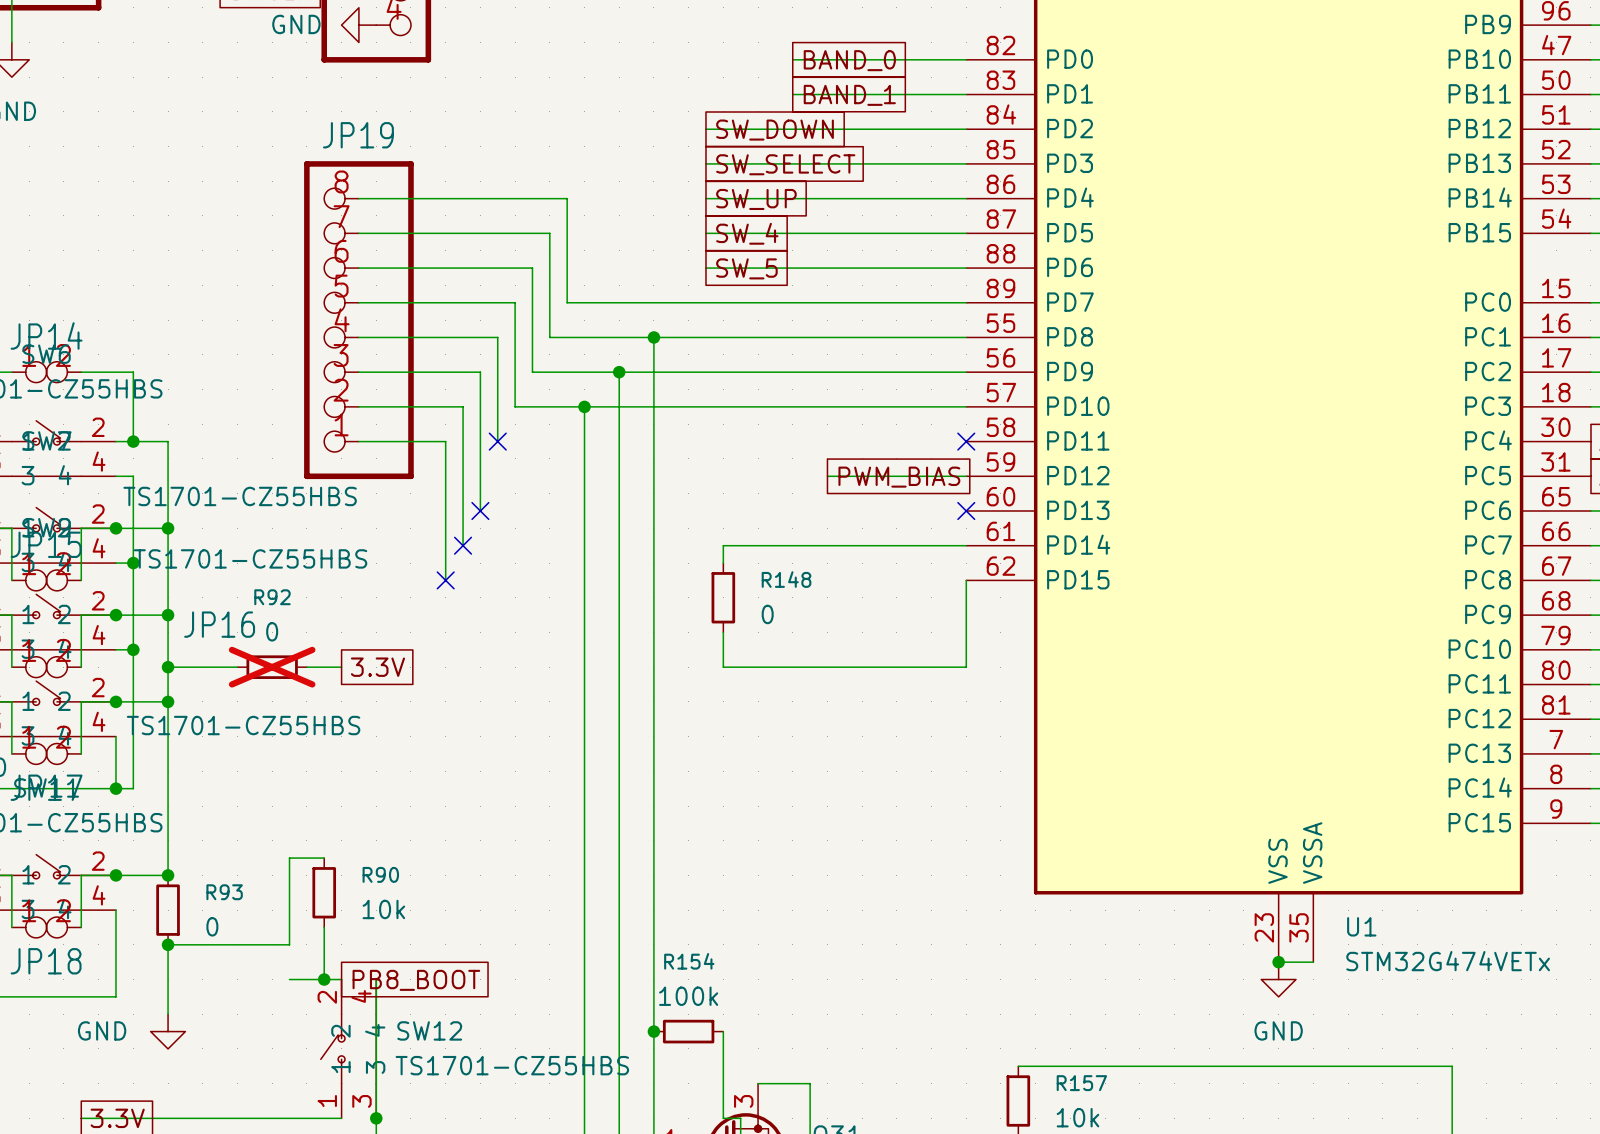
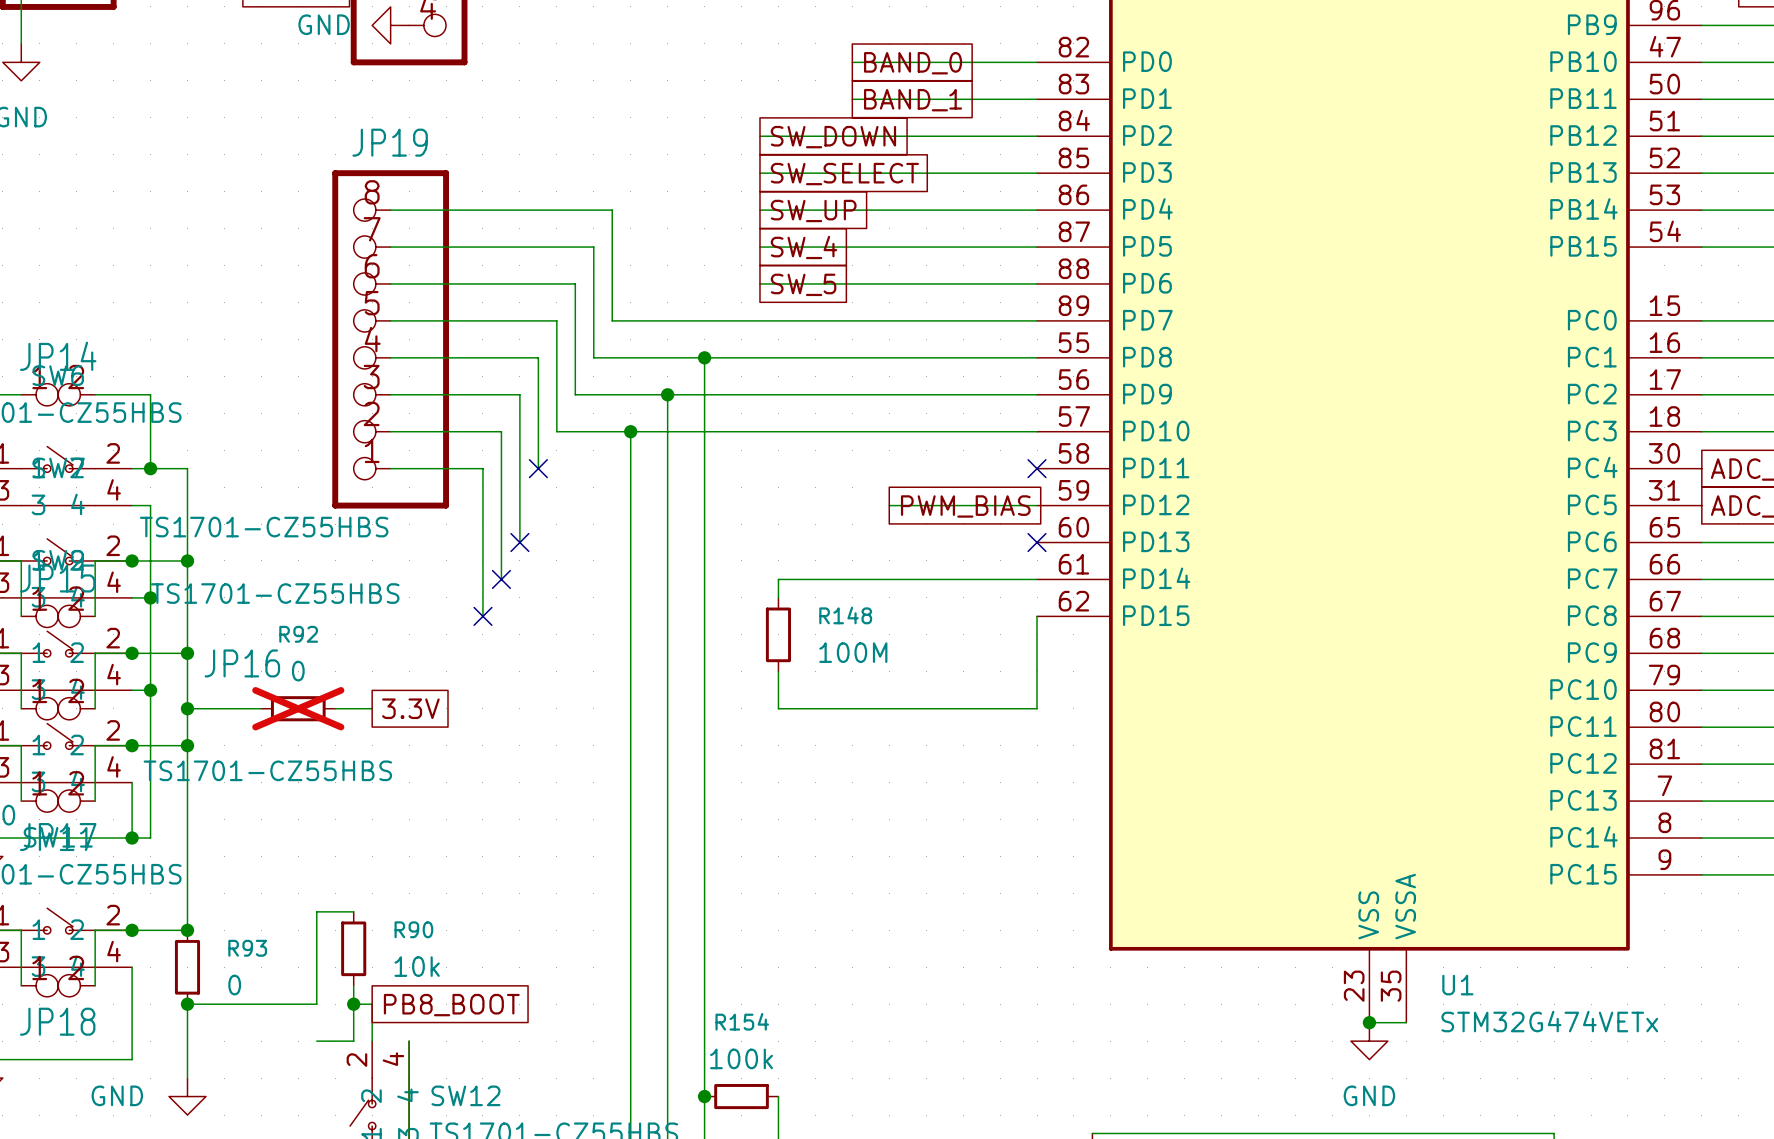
R148 value: 0 (767, 614) -> 100M (853, 652)
wire: (324, 979) (341, 979) -> (353, 1004) (372, 1004) (372, 1041)
junction position: (324, 979) -> (353, 1004)
global label position: PB8_BOOT (416, 980) -> PB8_BOOT (451, 1005)

